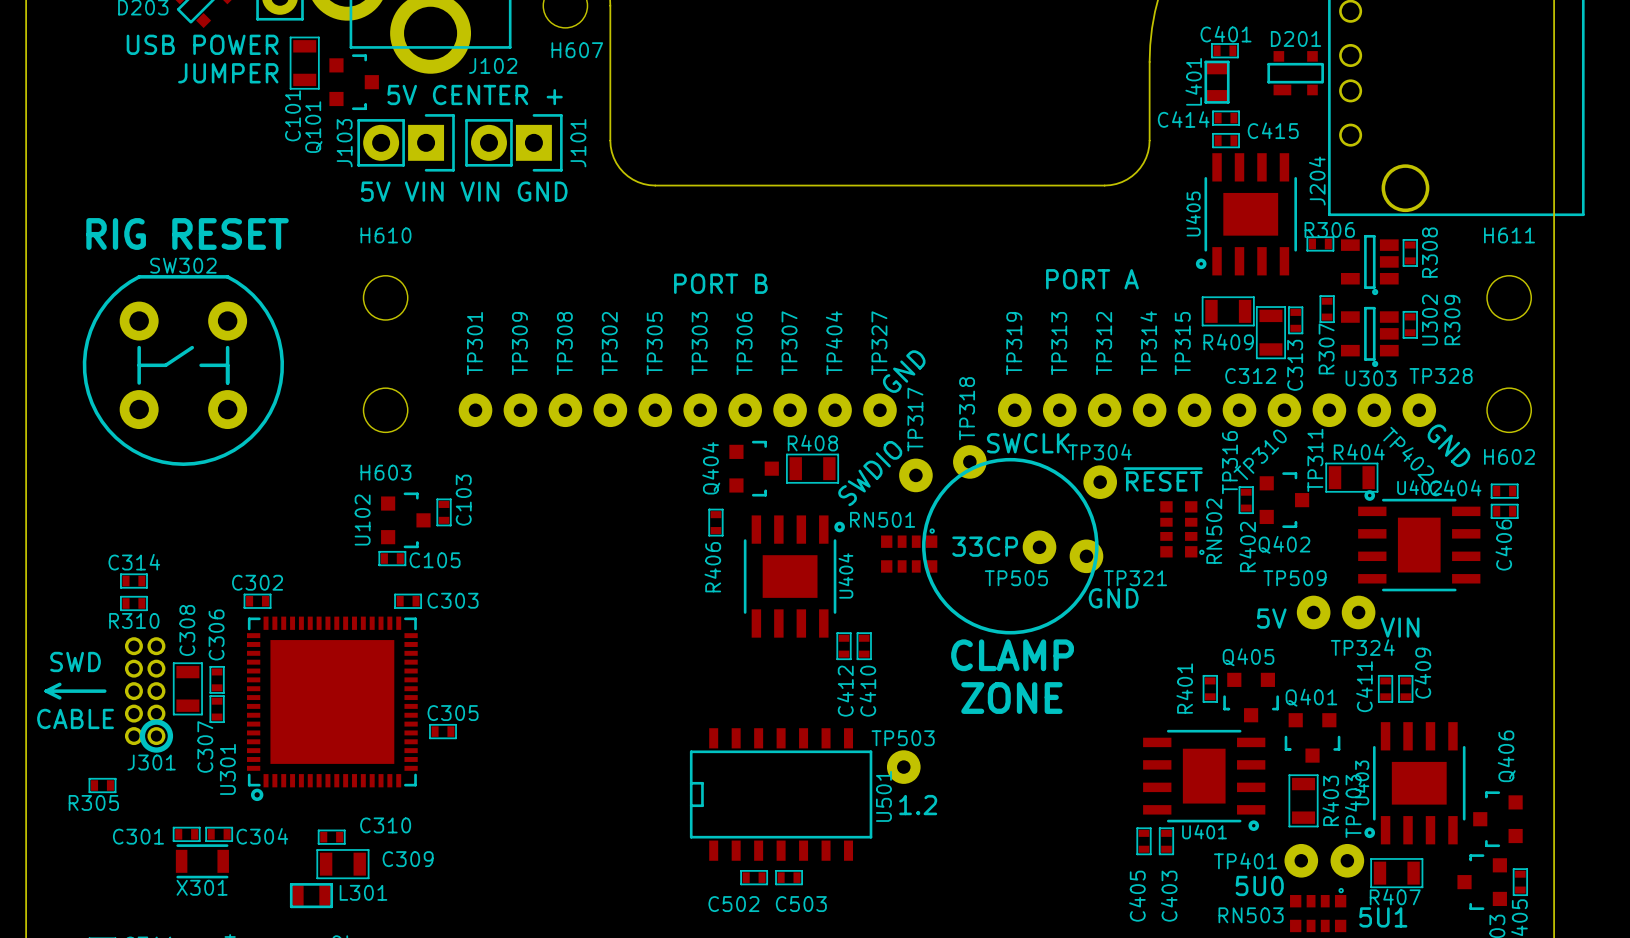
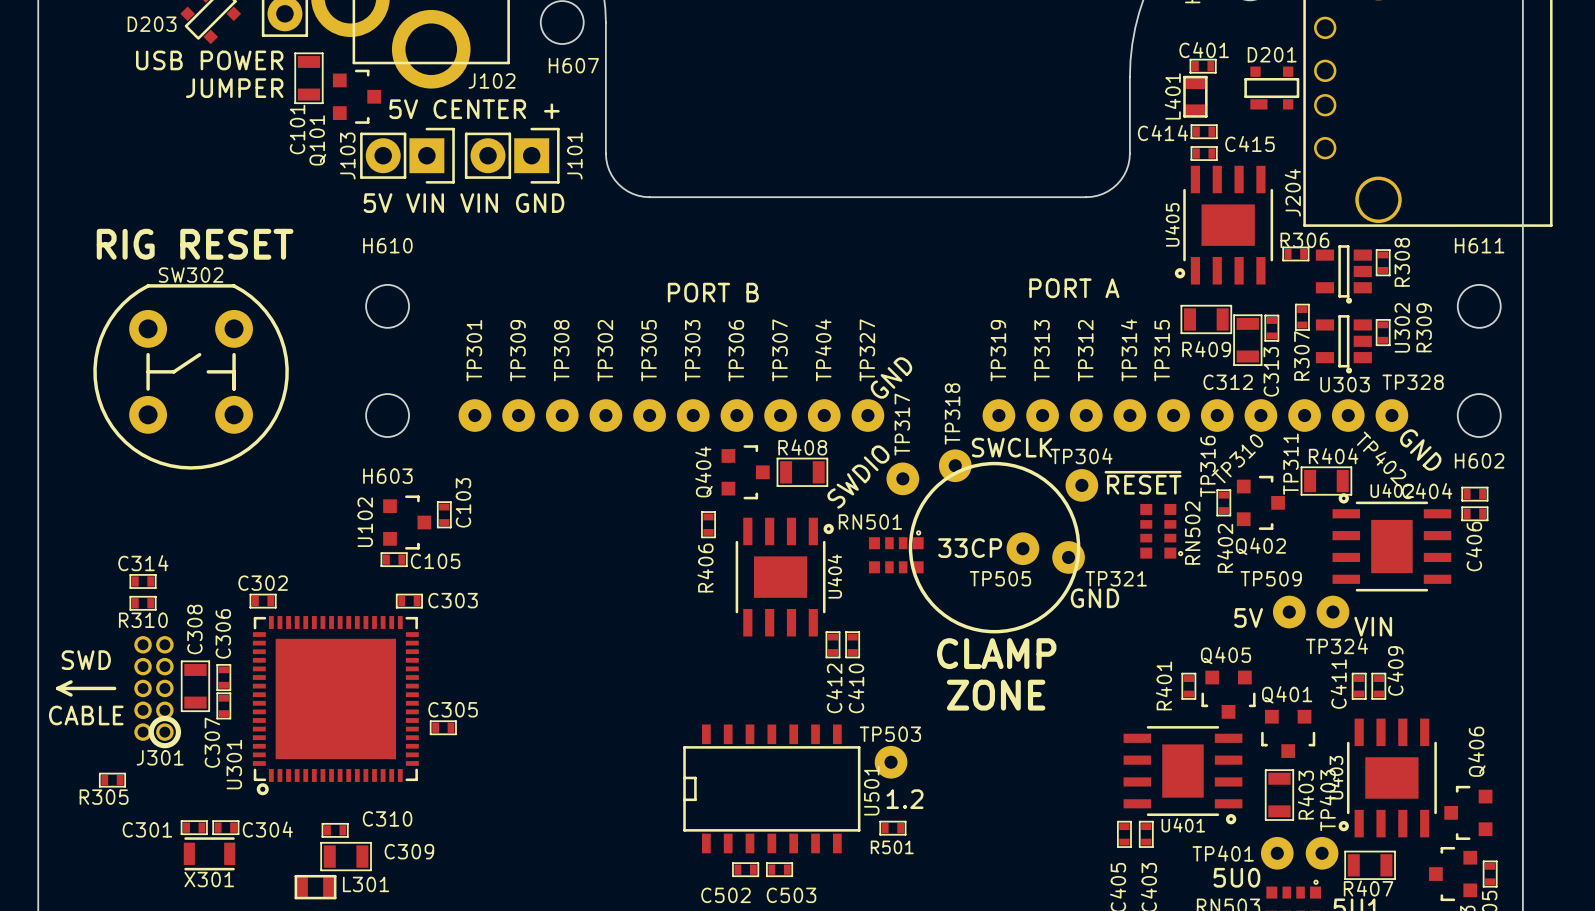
R501: none -> (892, 828)

